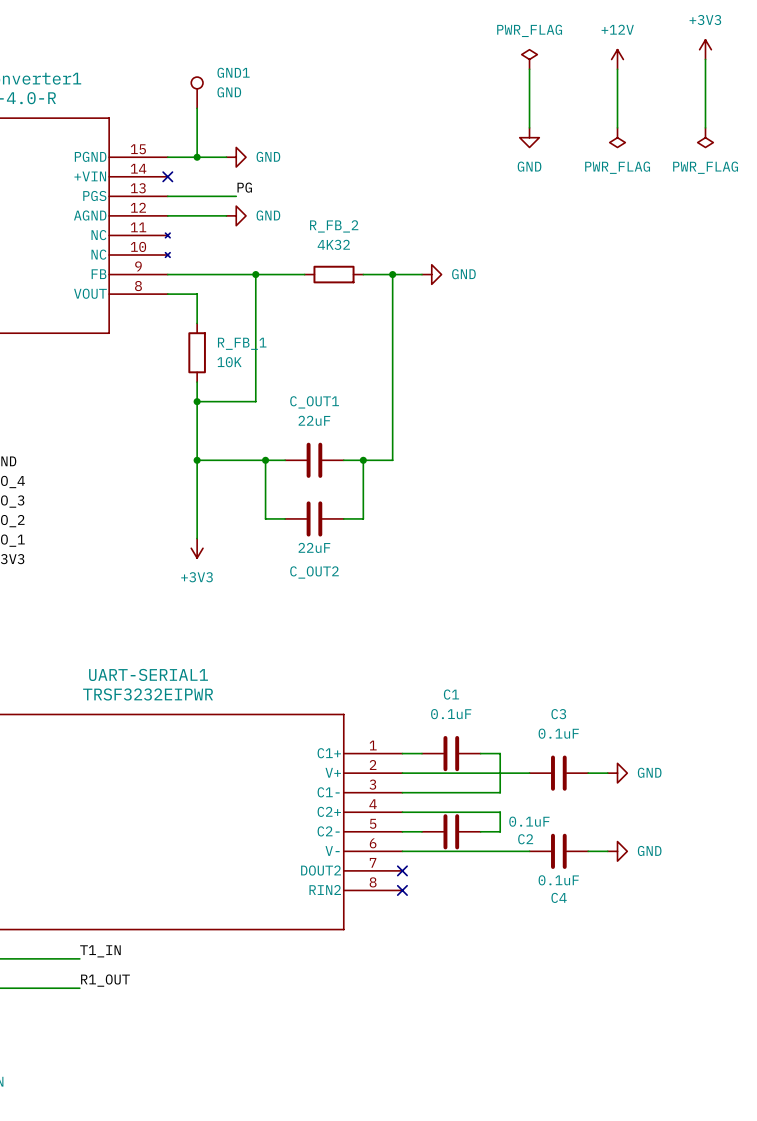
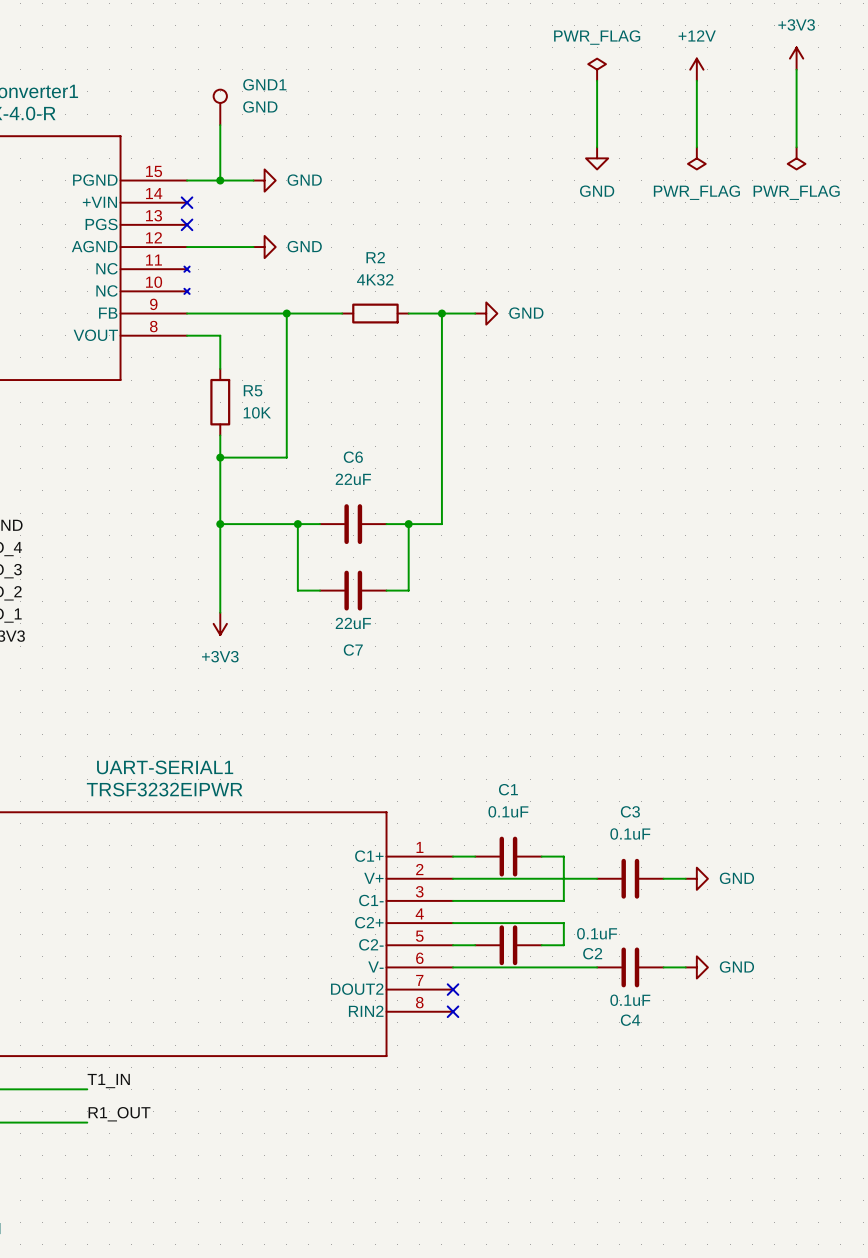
label: PG (244, 187) -> none
wire: (167, 196) (236, 196) -> none
no-connect mark: none -> (187, 224)
R_FB_2 name: R_FB_2 (334, 226) -> R2 (375, 257)
R_FB_1 name: R_FB_1 (242, 343) -> R5 (253, 390)
C_OUT1 name: C_OUT1 (314, 402) -> C6 (353, 457)
C_OUT2 name: C_OUT2 (314, 572) -> C7 (353, 650)

